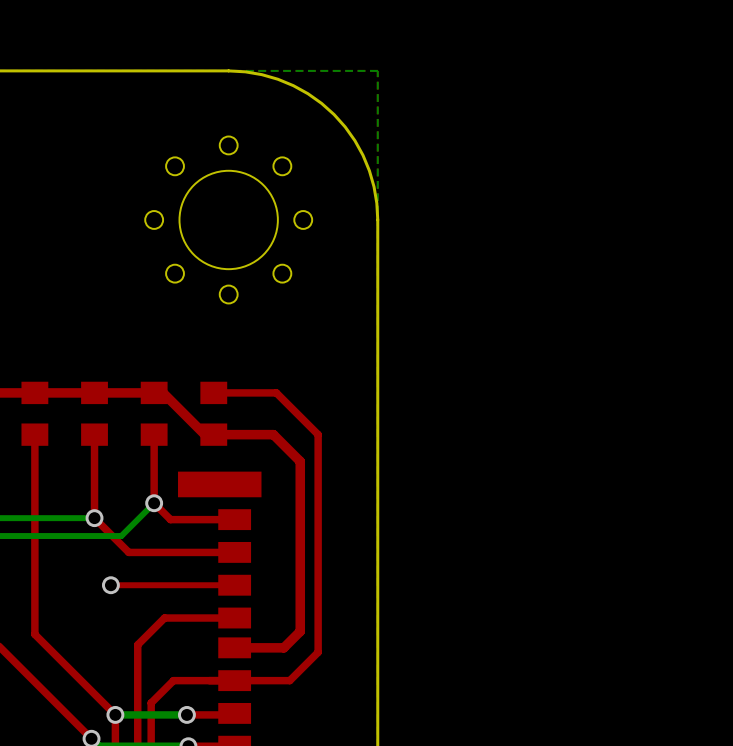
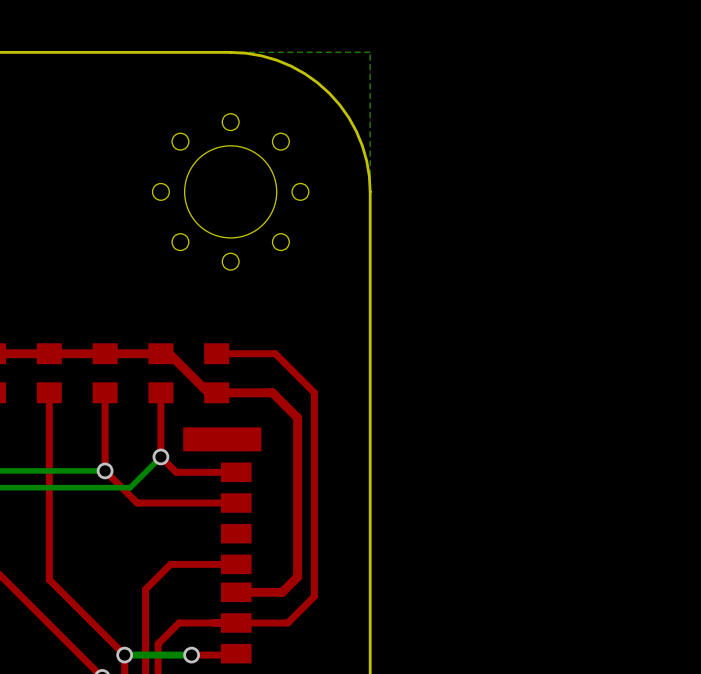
via: (110, 585) -> none
top track: (234, 585) (110, 585) -> none

